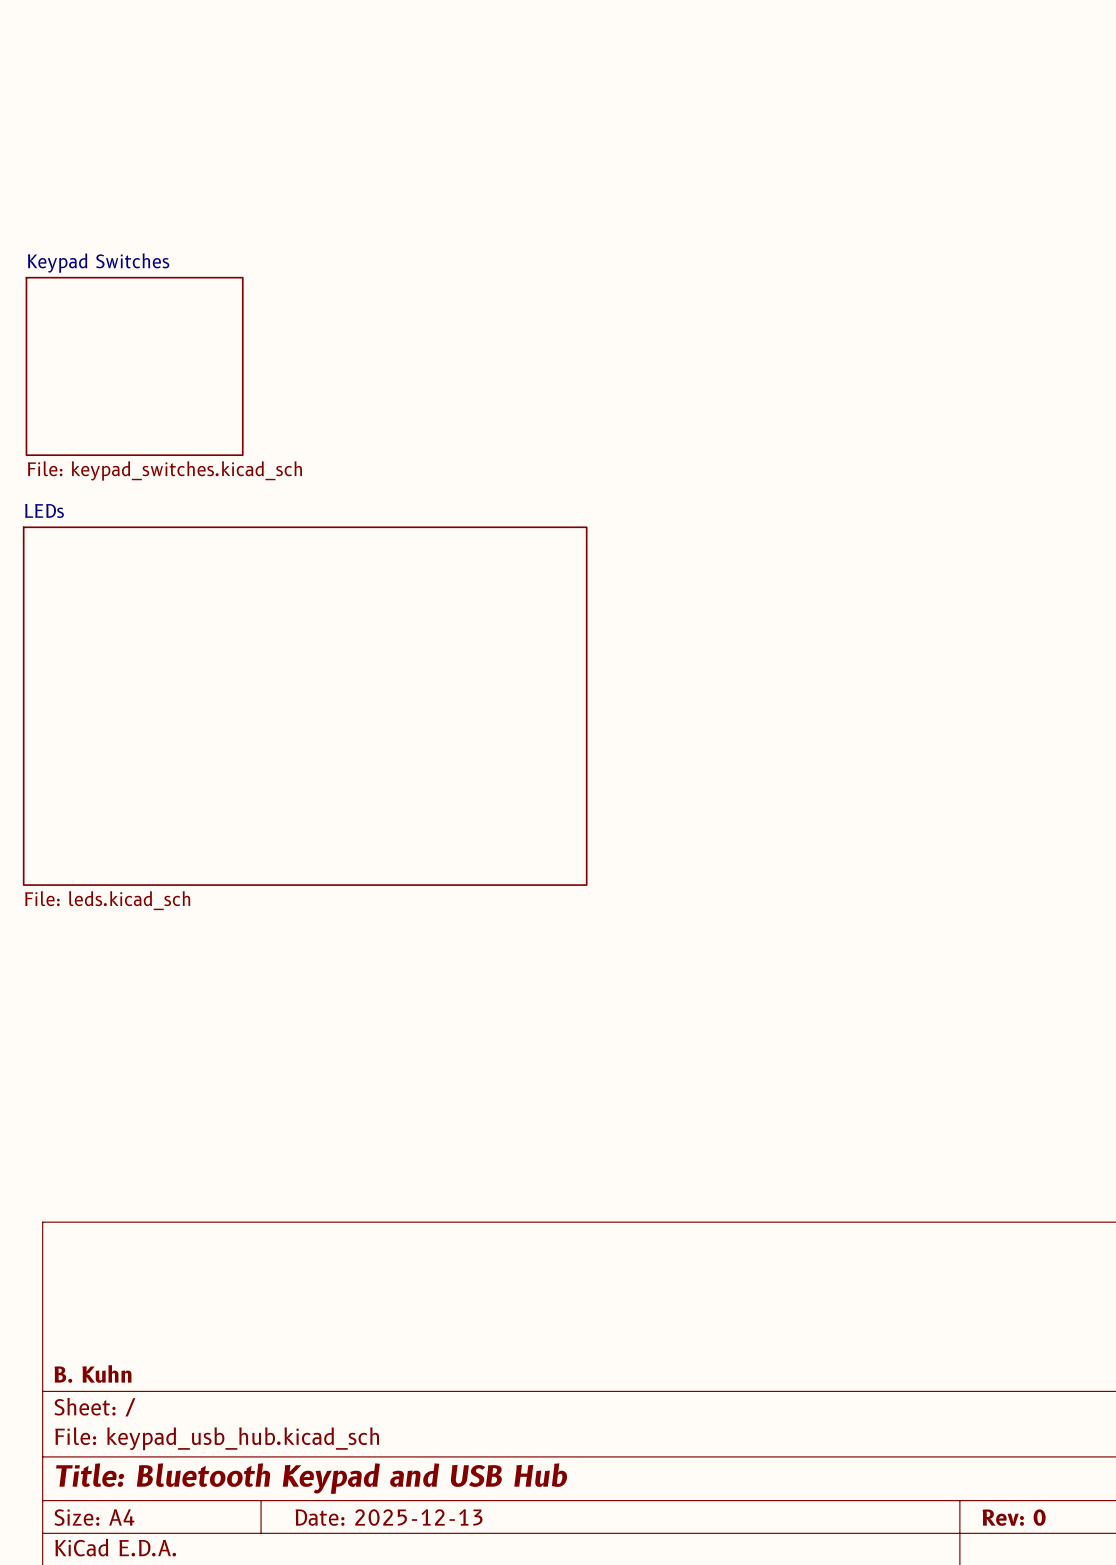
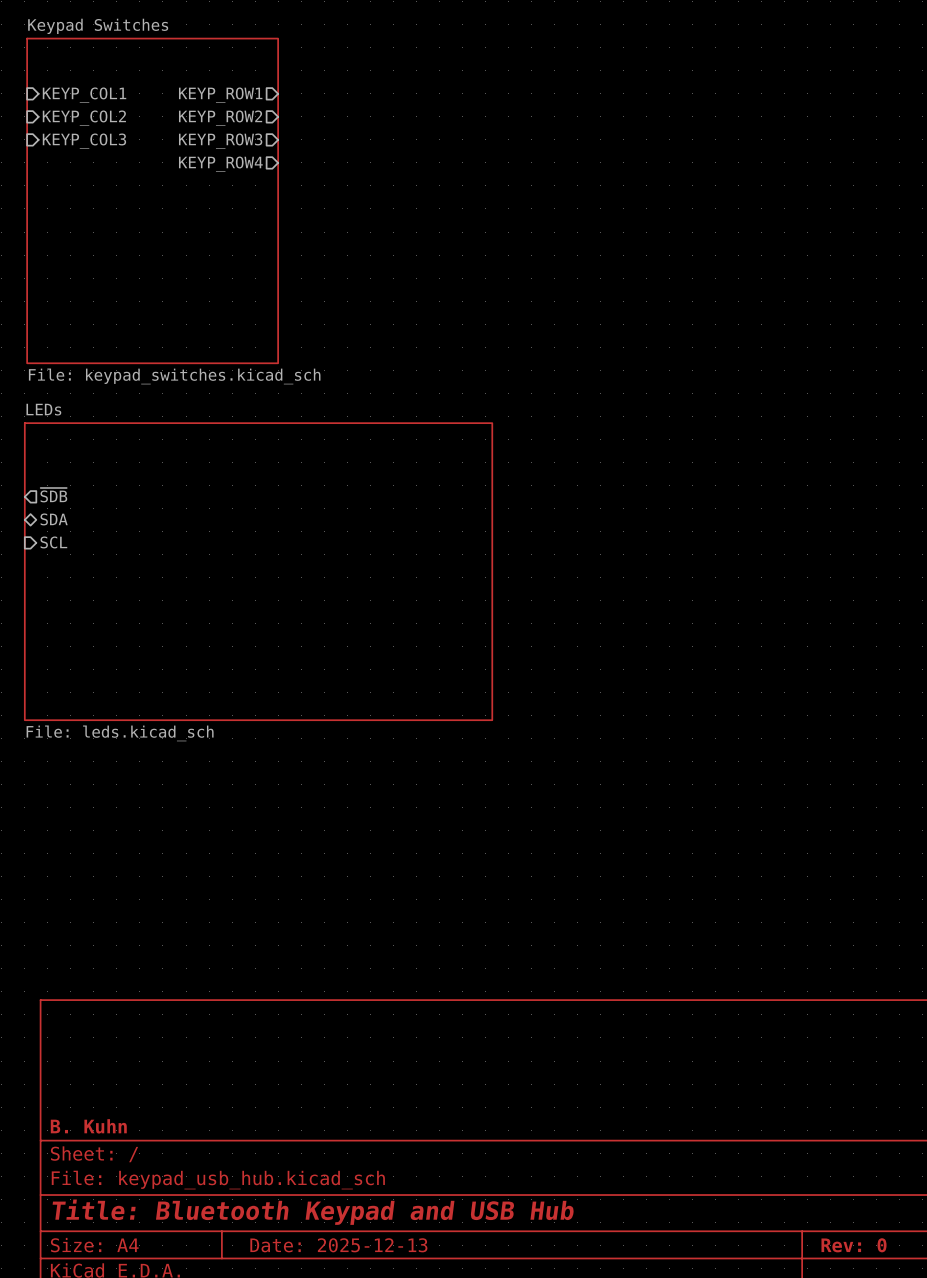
sheet pin: none -> KEYP_COL1 (84, 95)
sheet pin: none -> KEYP_ROW1 (220, 95)
sheet pin: none -> KEYP_COL2 (84, 118)
sheet pin: none -> KEYP_ROW2 (220, 118)
sheet pin: none -> KEYP_COL3 (84, 141)
sheet pin: none -> KEYP_ROW3 (220, 141)
sheet pin: none -> KEYP_ROW4 (220, 164)
sheet Keypad Switches: none -> File: keypad_switches.kicad_sch (152, 200)
sheet Keypad Switches: File: keypad_switches.kicad_sch (134, 366) -> none
sheet pin: none -> ~{SDB} (53, 495)
sheet pin: none -> SDA (54, 519)
sheet pin: none -> SCL (53, 542)

